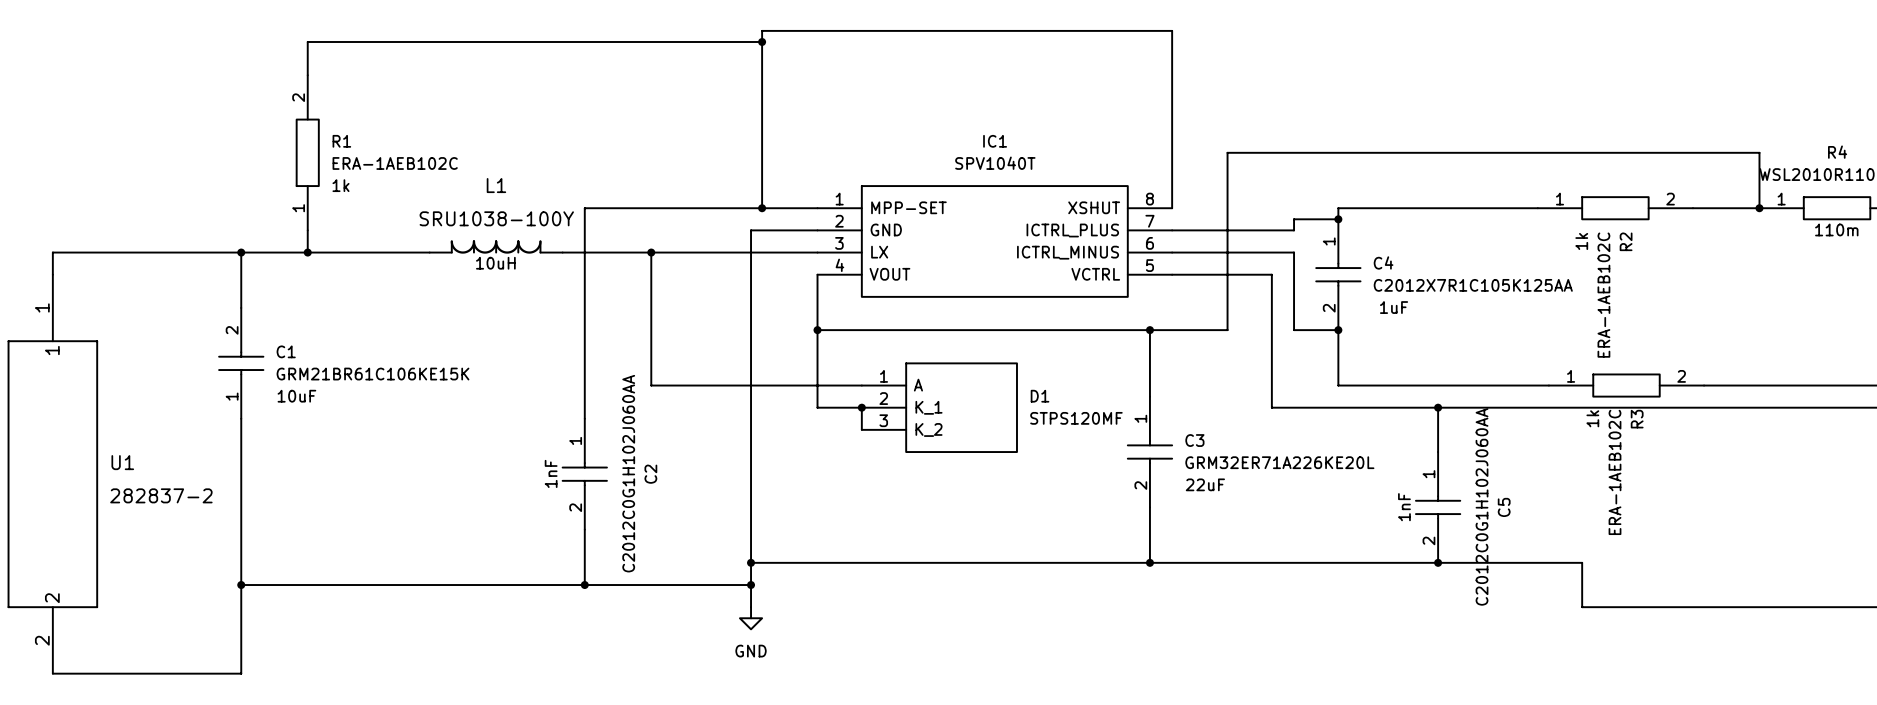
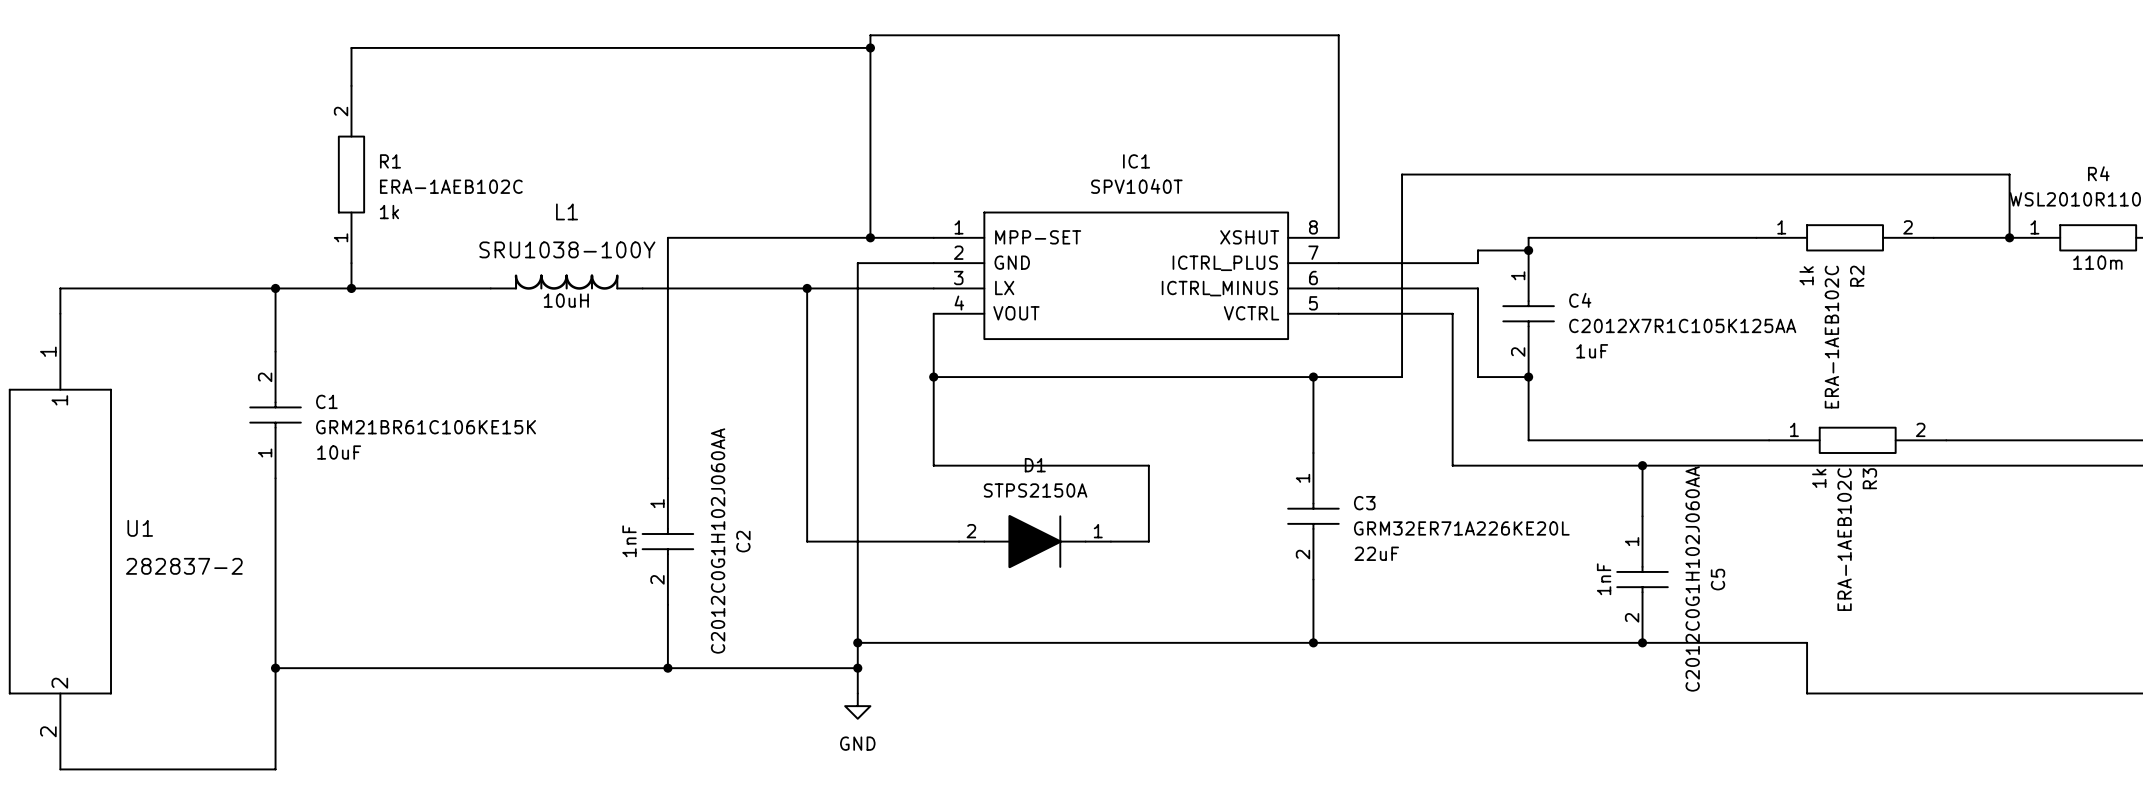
wire: (651, 252) (651, 385) (861, 385) -> none
junction: (651, 252) -> none
wire: none -> (807, 288) (807, 541) (959, 541)
junction: none -> (807, 288)
D1 symbol: [861, 362, 1018, 453] -> [959, 515, 1111, 569]
D1 name position: D1 (1040, 396) -> D1 (1035, 465)
wire: (861, 407) (861, 429) -> (984, 465) (1148, 465) (1148, 541) (1110, 541)
junction: (861, 407) -> none
D1 value: STPS120MF (1076, 418) -> STPS2150A (1035, 490)

